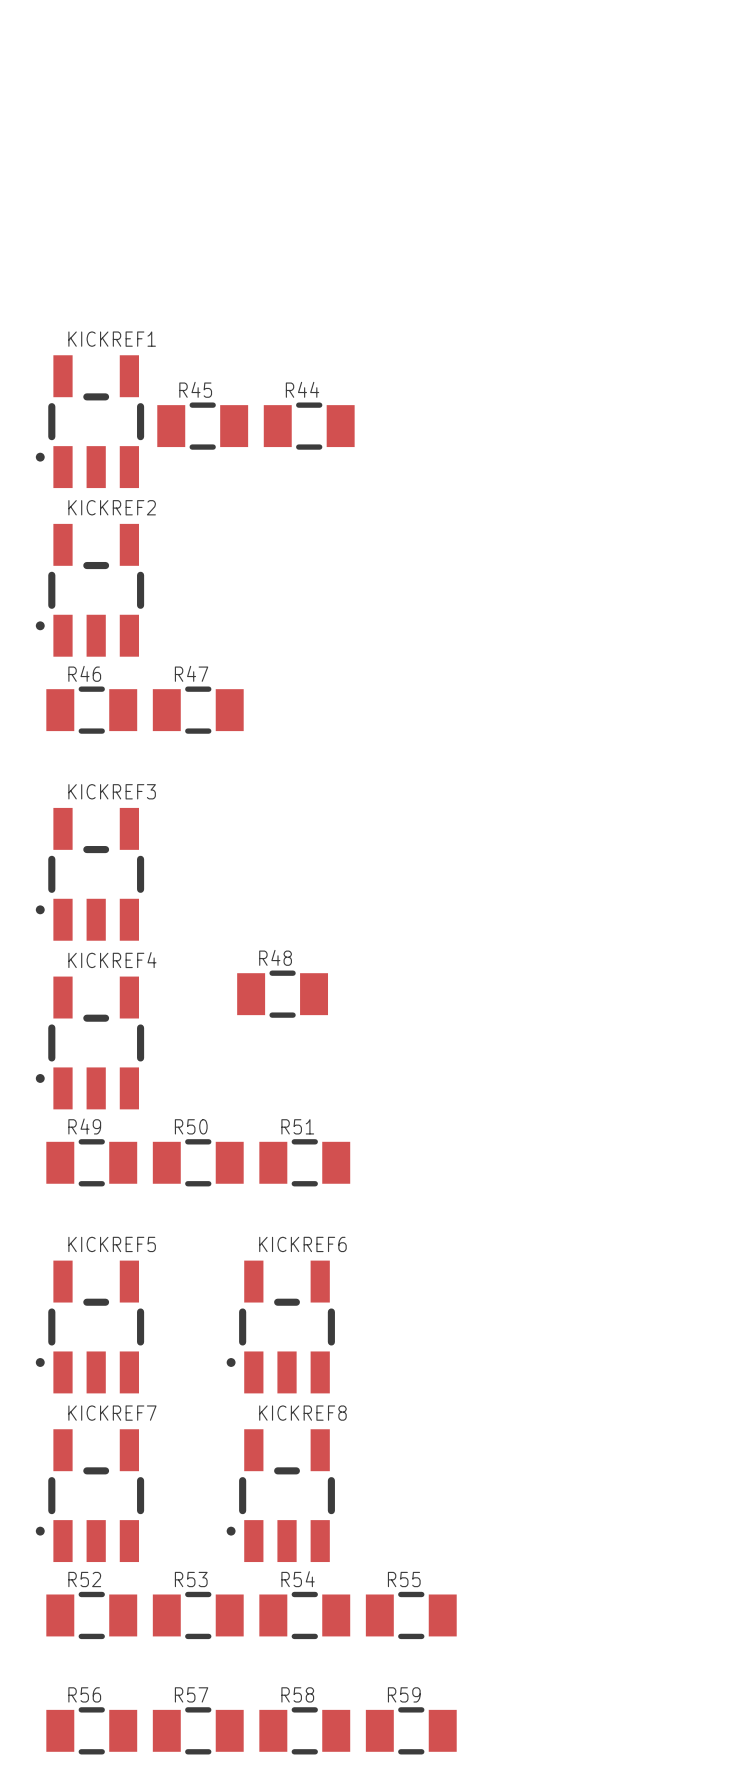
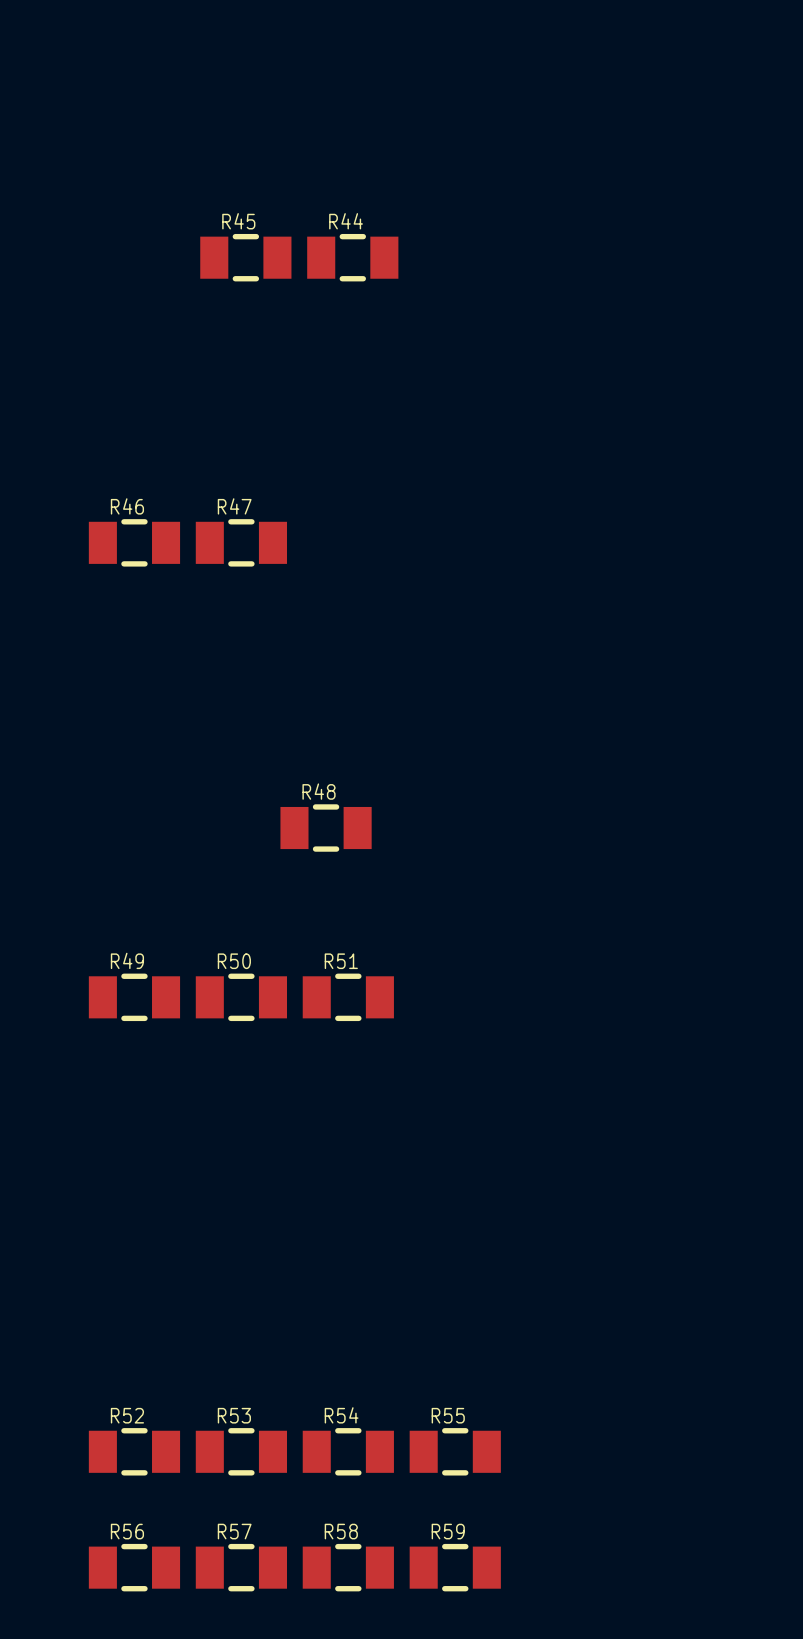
KICKREF1: (89, 421) -> none
KICKREF2: (89, 590) -> none
KICKREF3: (89, 874) -> none
KICKREF4: (89, 1042) -> none
KICKREF5: (89, 1326) -> none
KICKREF6: (280, 1326) -> none
KICKREF7: (89, 1495) -> none
KICKREF8: (280, 1495) -> none

